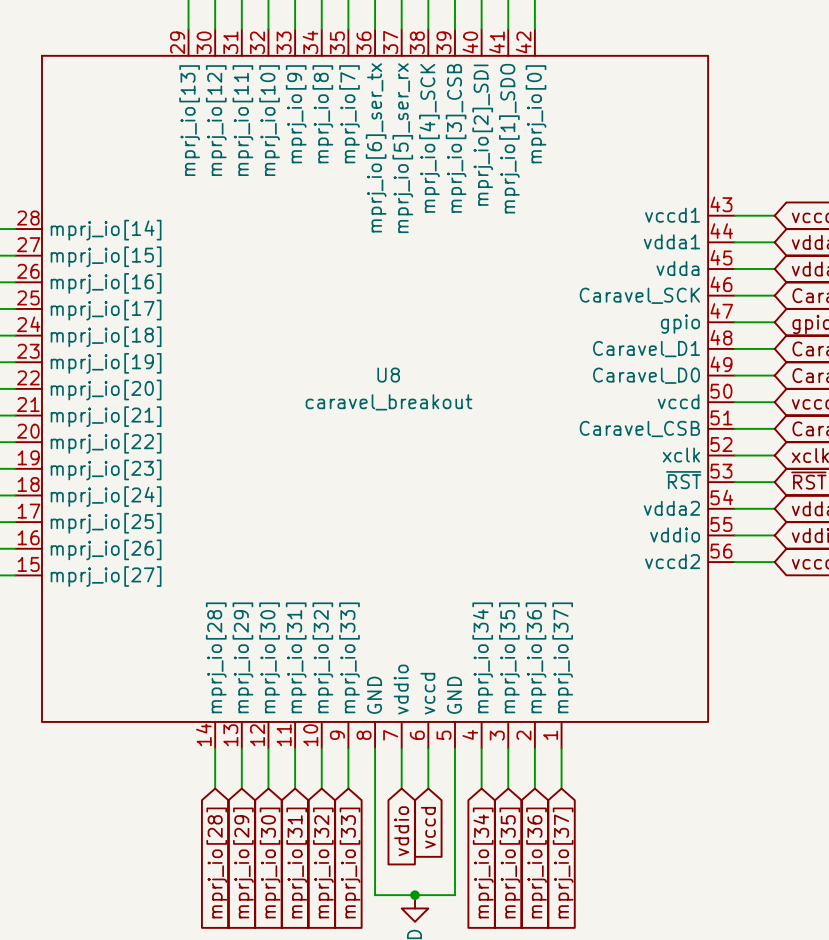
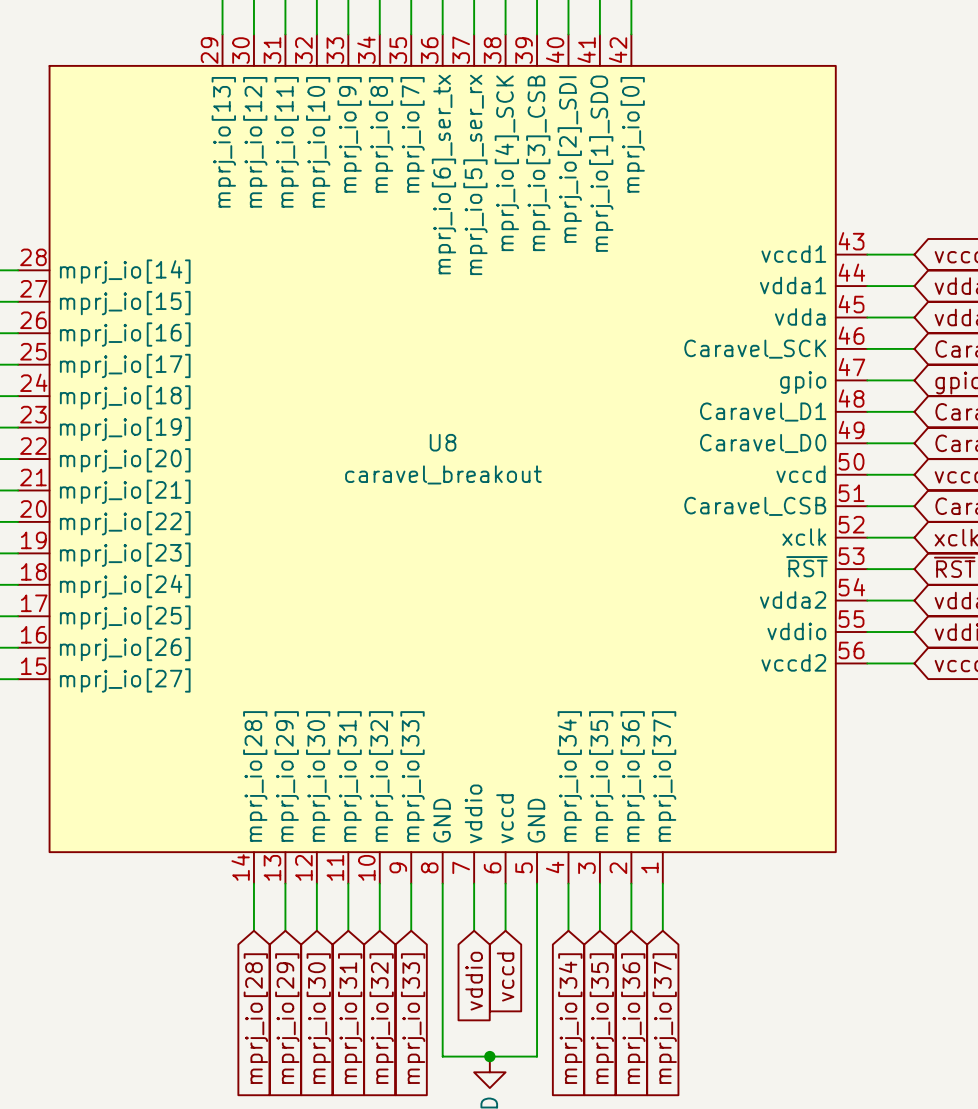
U8 symbol: [15, 29, 735, 749] -> [18, 34, 868, 884]

